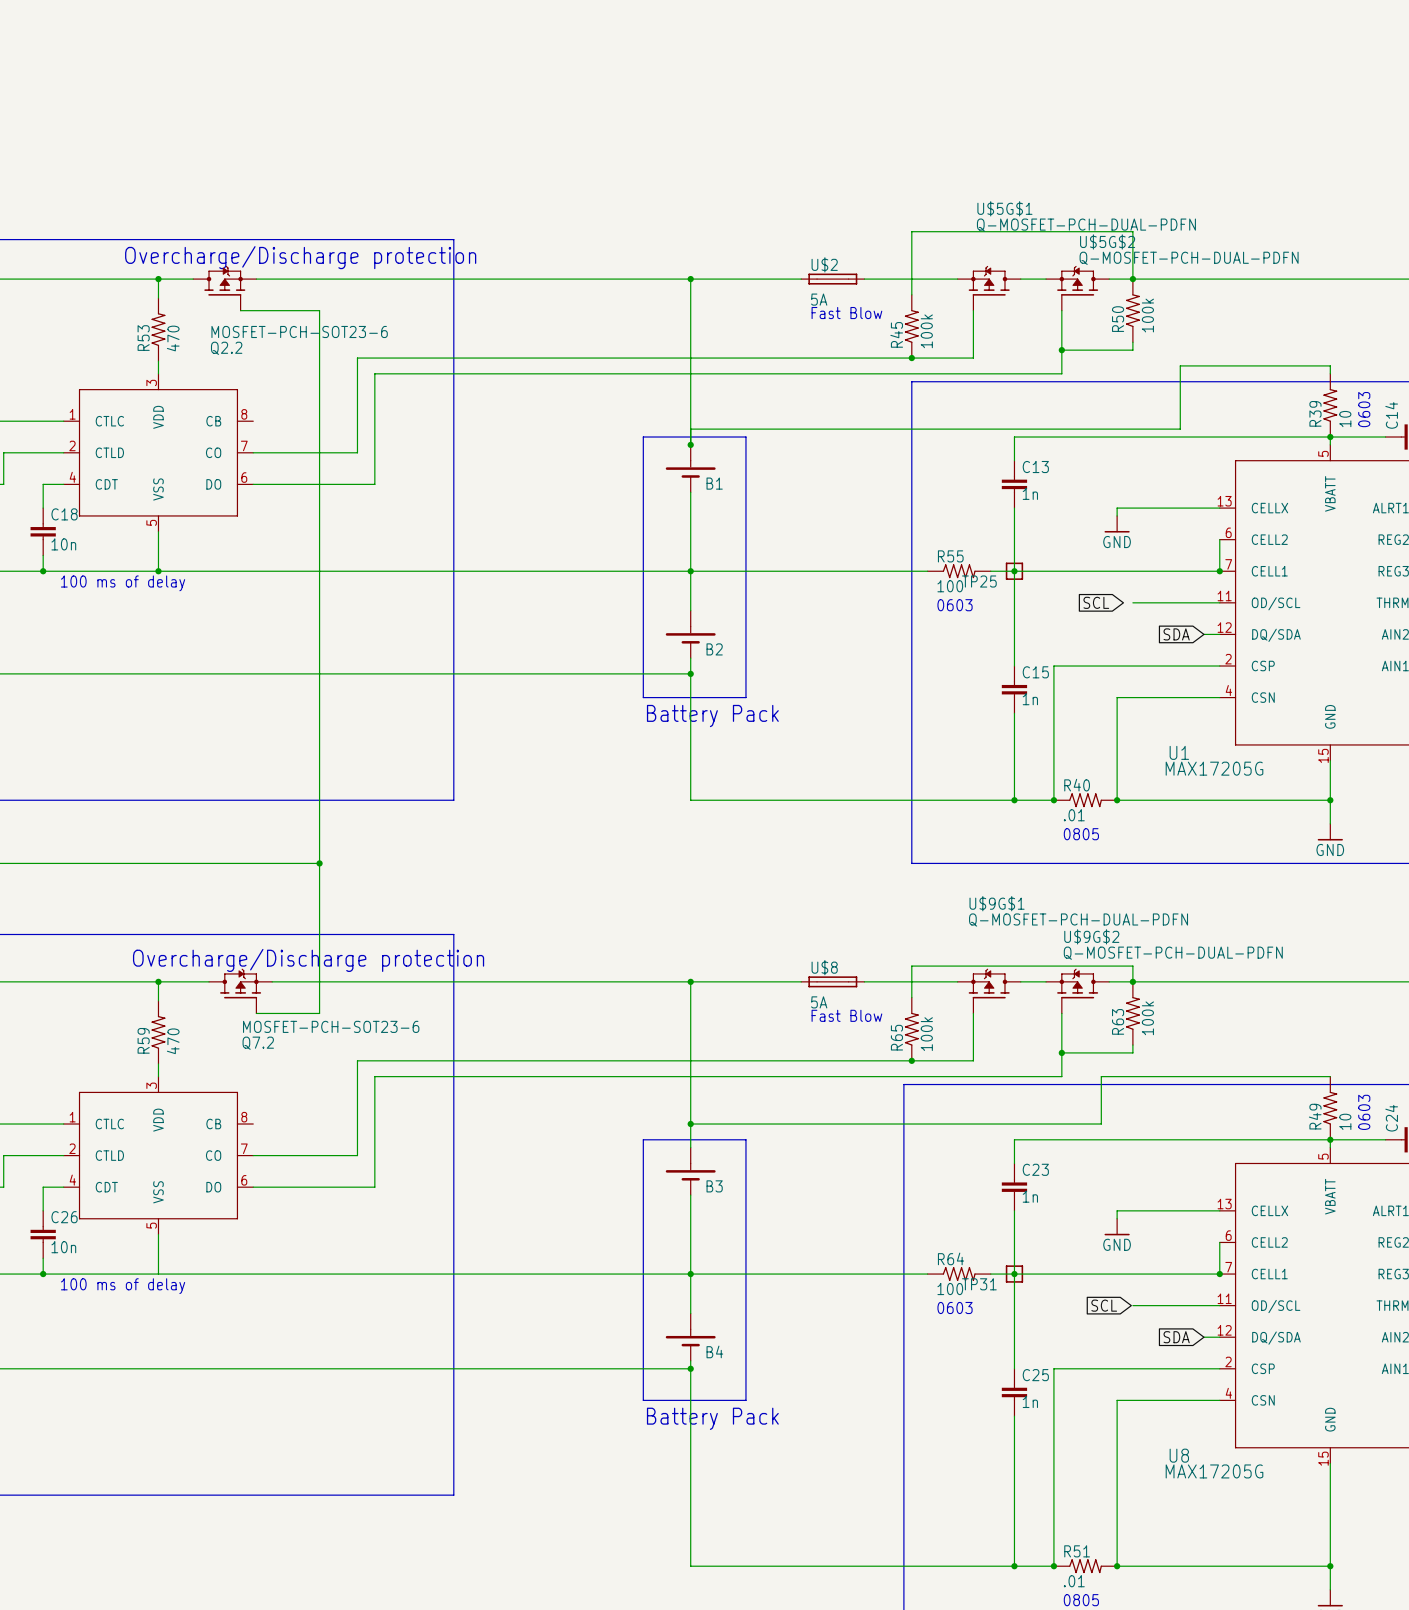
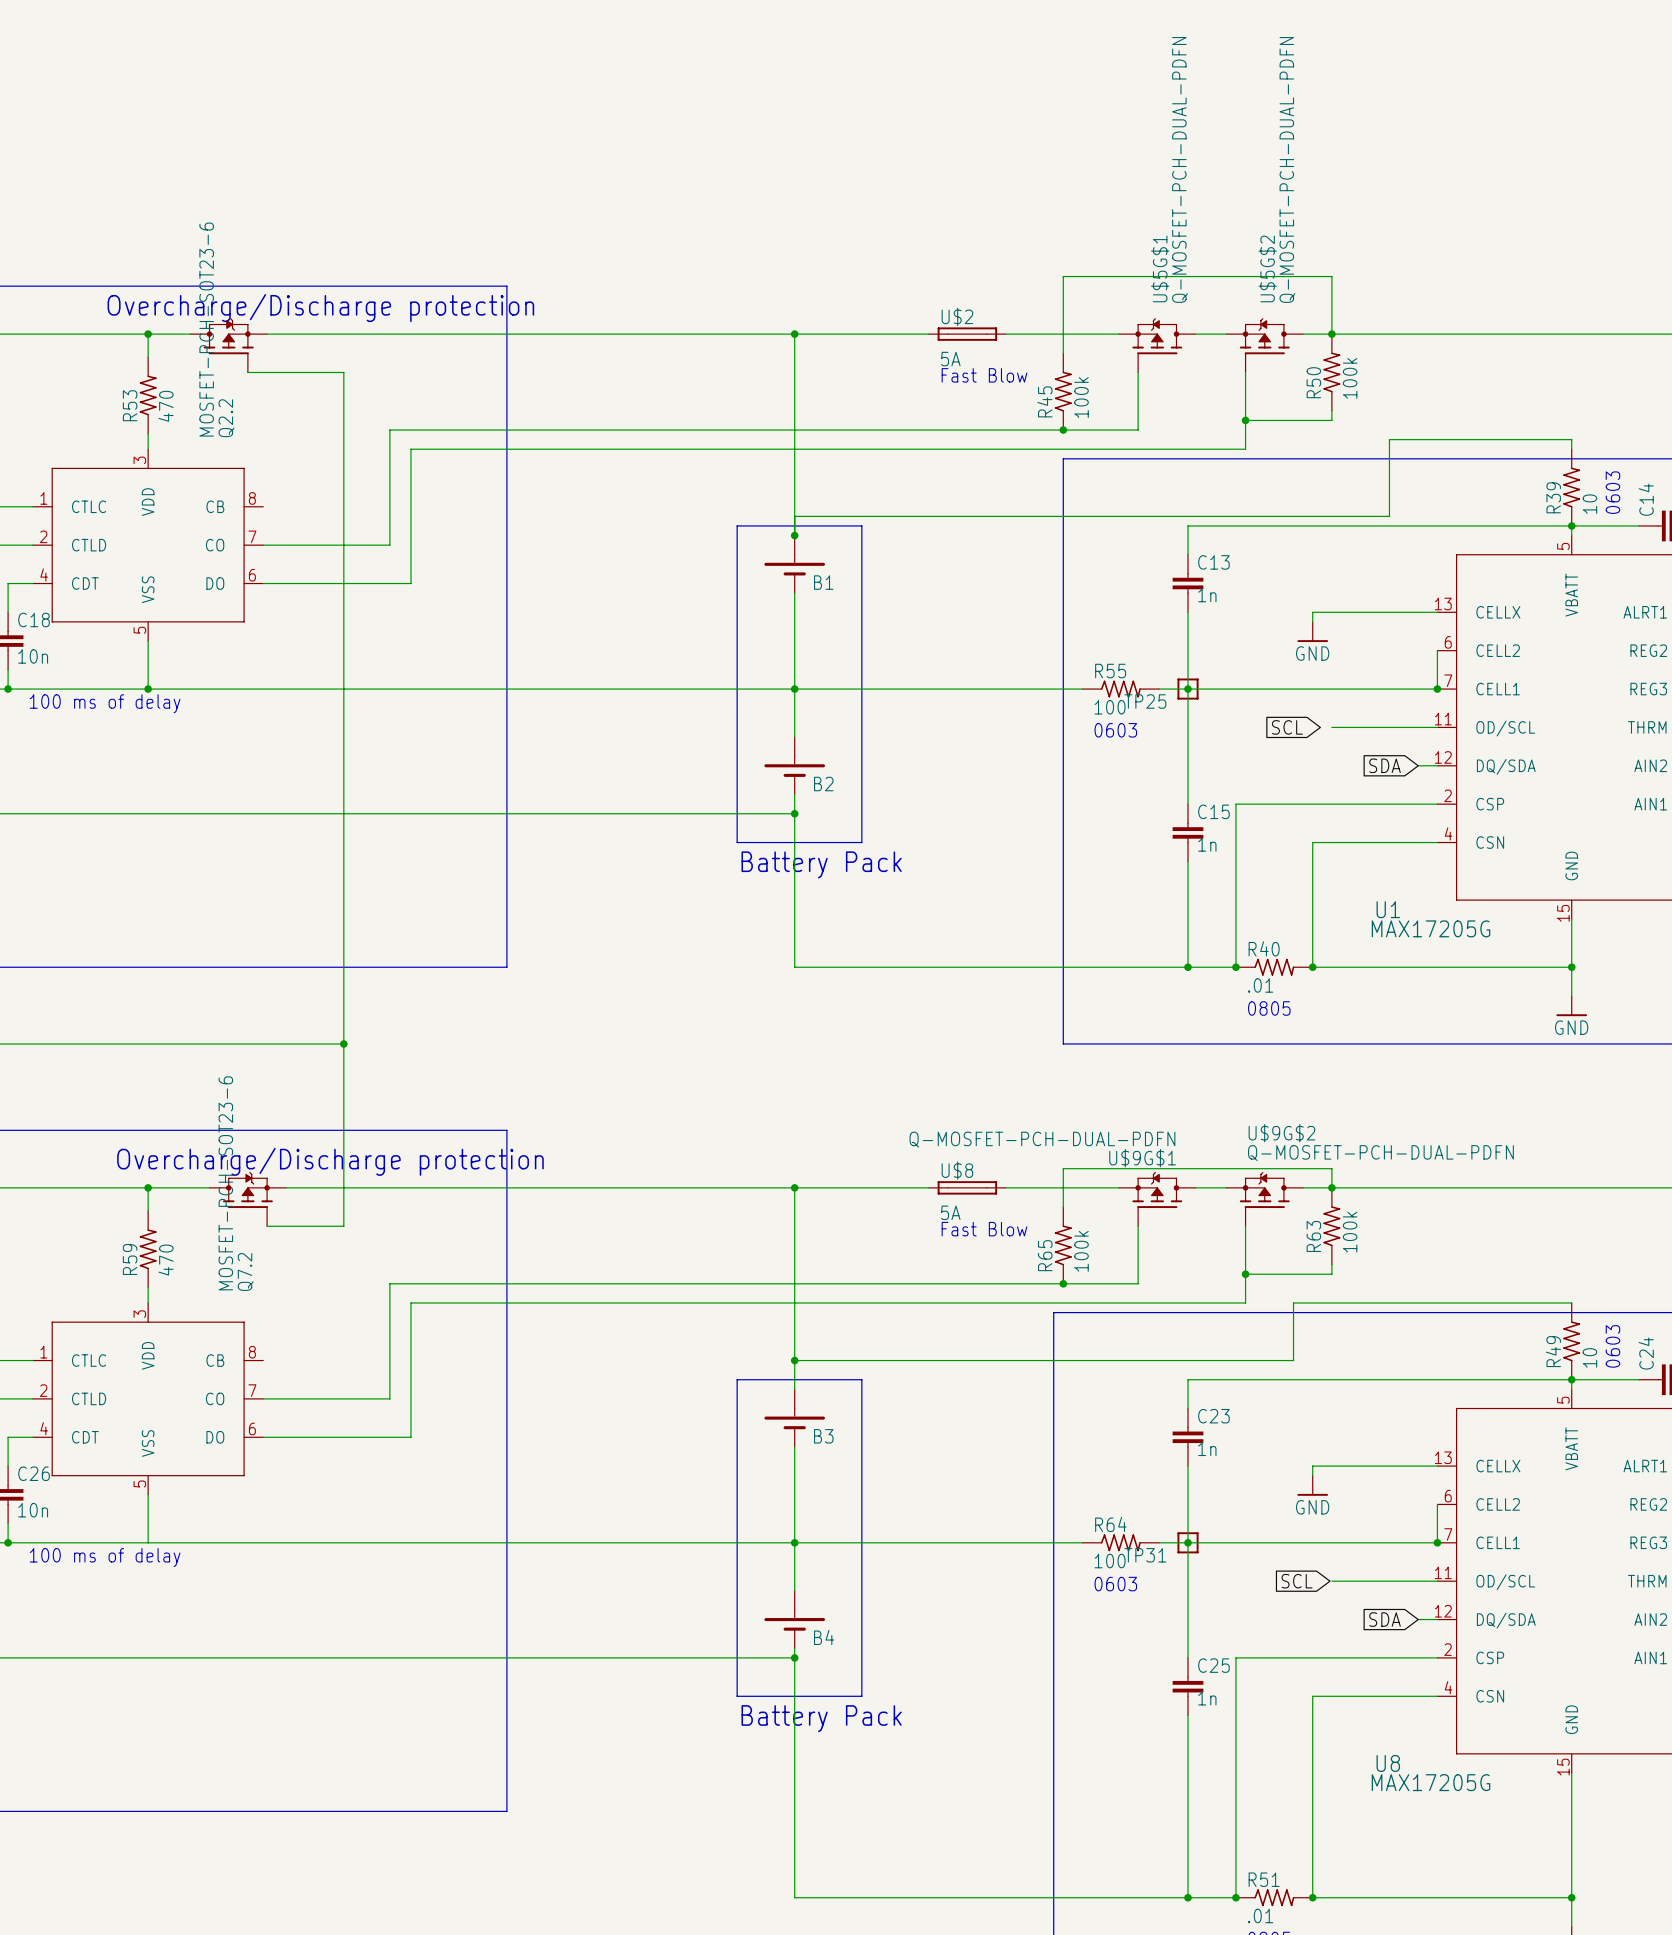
U$5G$1 name rotation: 0° (1004, 208) -> 90° counterclockwise (1160, 268)
U$5G$1 value rotation: 0° (1086, 225) -> 90° counterclockwise (1180, 169)
U$5G$2 name rotation: 0° (1107, 241) -> 90° counterclockwise (1267, 268)
U$5G$2 value rotation: 0° (1189, 258) -> 90° counterclockwise (1287, 169)
Q2.2 value rotation: 0° (299, 331) -> 90° counterclockwise (206, 329)
Q2.2 name rotation: 0° (226, 348) -> 90° counterclockwise (226, 418)
U$9G$1 name position: U$9G$1 (997, 903) -> U$9G$1 (1142, 1158)
U$9G$1 value position: Q-MOSFET-PCH-DUAL-PDFN (1078, 920) -> Q-MOSFET-PCH-DUAL-PDFN (1042, 1139)
Q7.2 value rotation: 0° (331, 1026) -> 90° counterclockwise (225, 1183)
Q7.2 name rotation: 0° (258, 1043) -> 90° counterclockwise (245, 1271)

